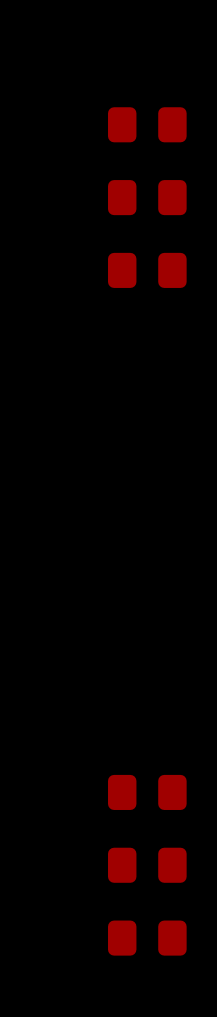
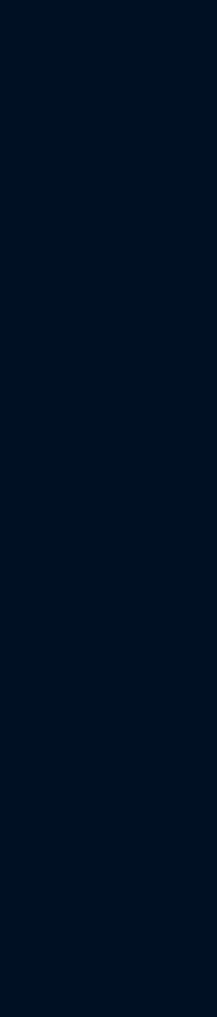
part: (147, 124) -> none
part: (147, 197) -> none
part: (147, 270) -> none
part: (147, 792) -> none
part: (147, 865) -> none
part: (147, 938) -> none

